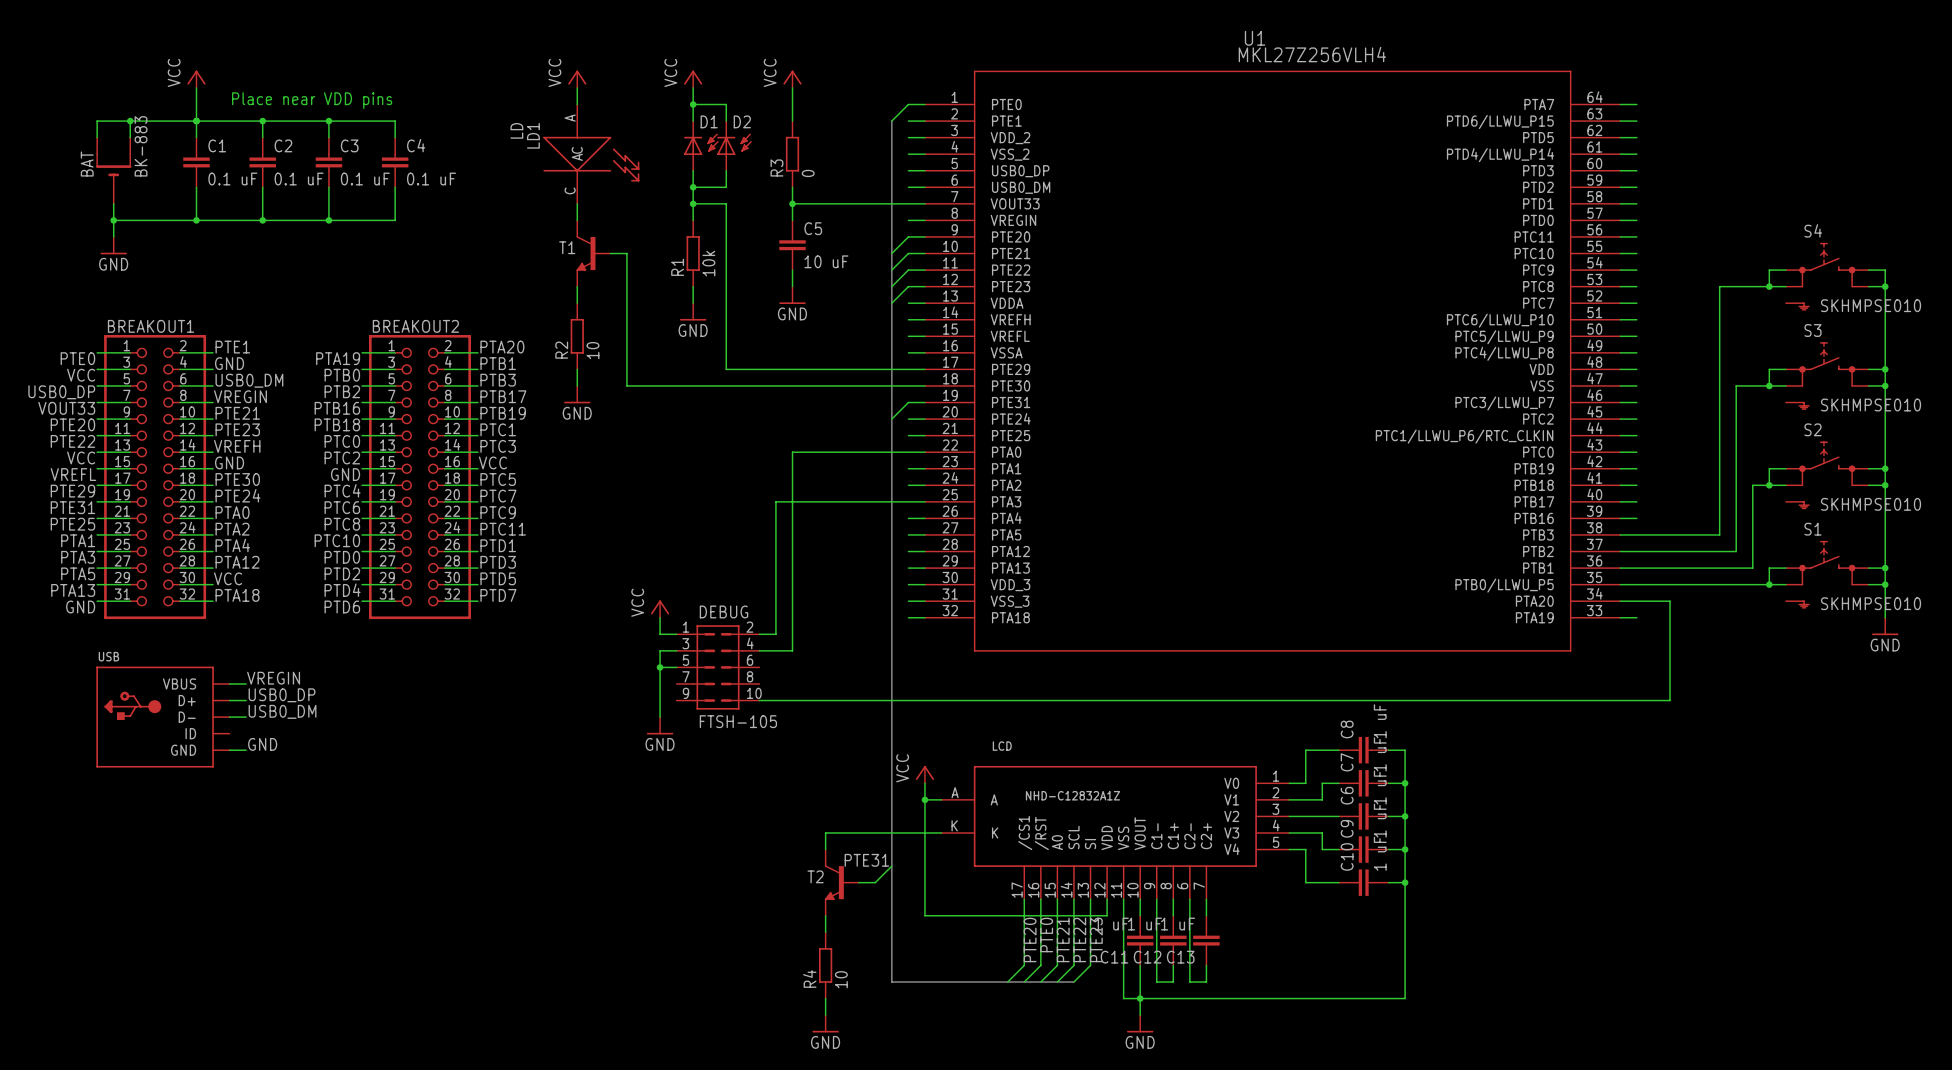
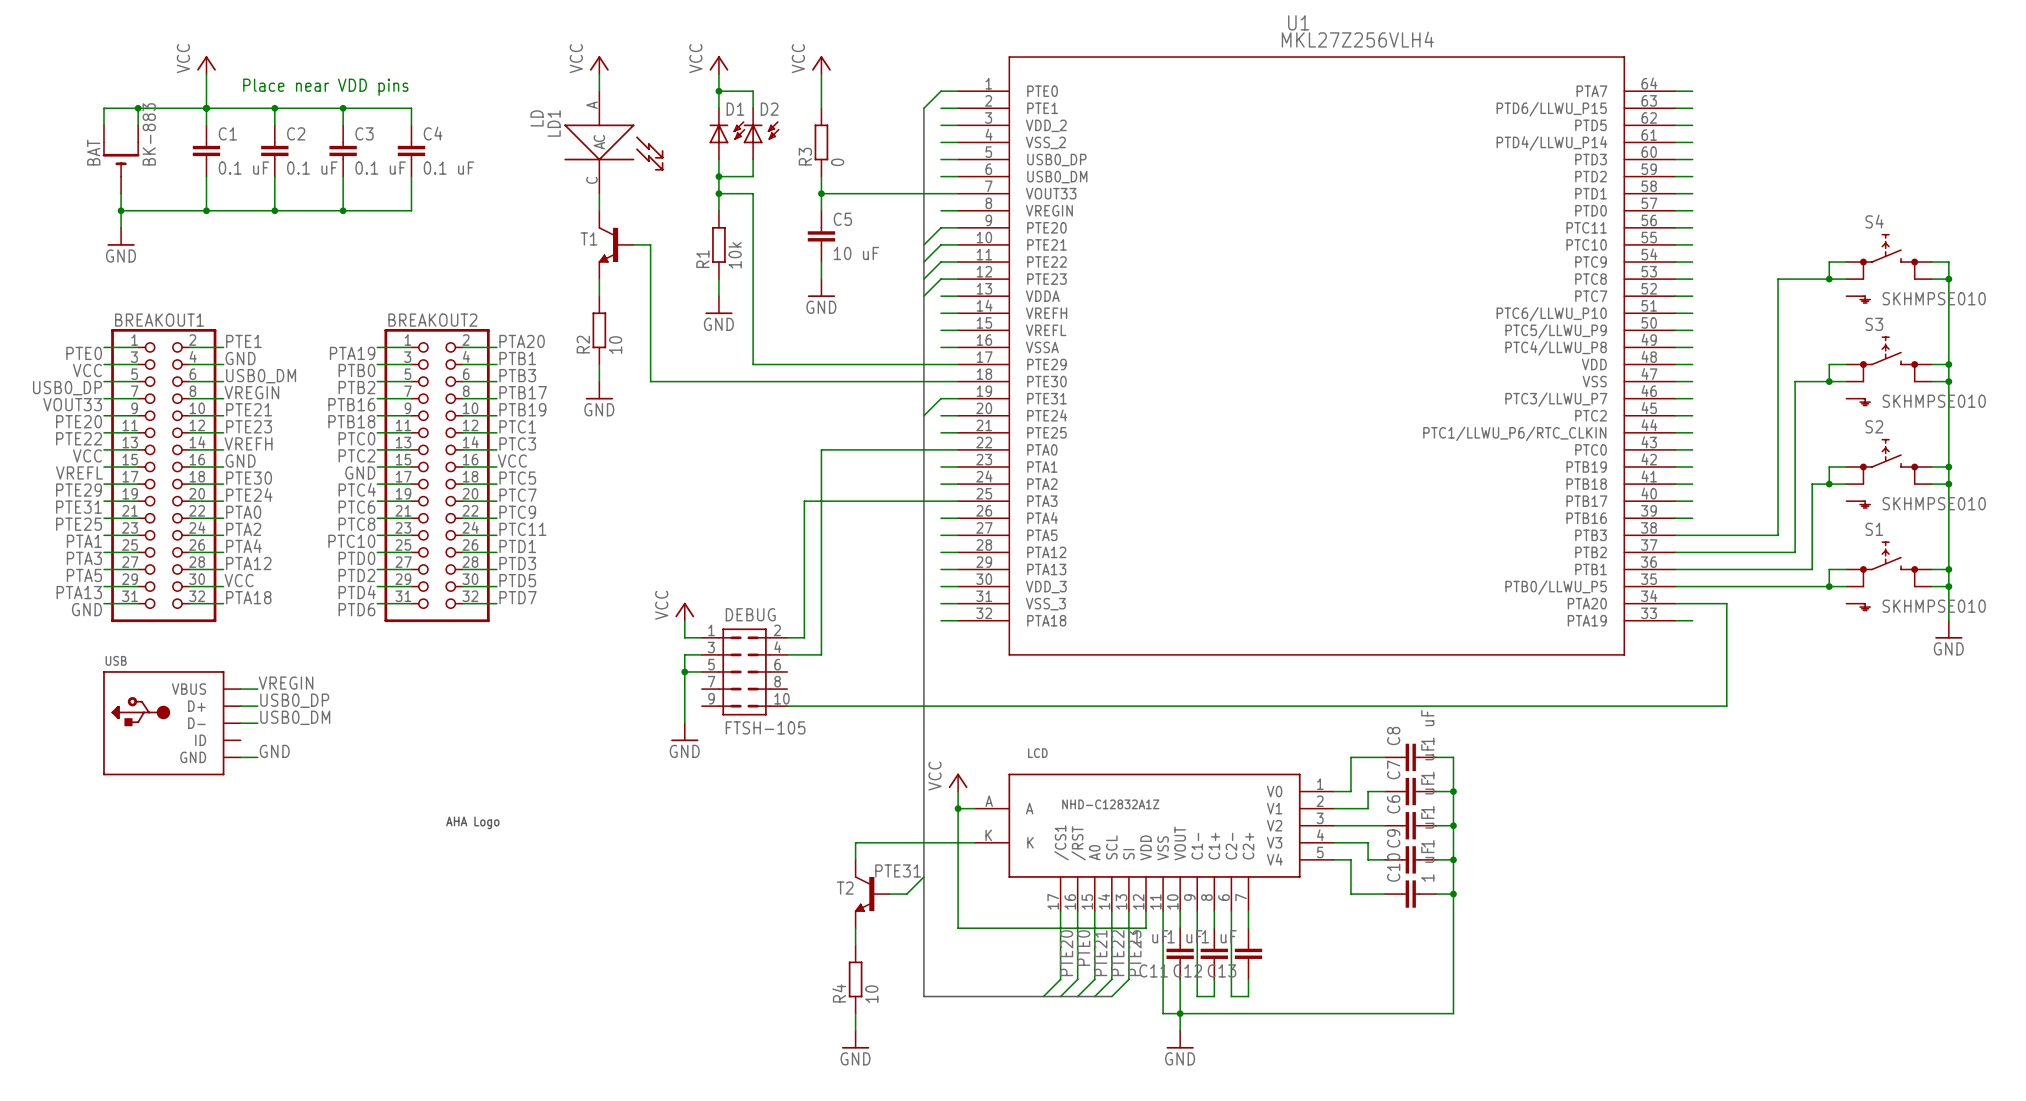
part: none -> (472, 822)

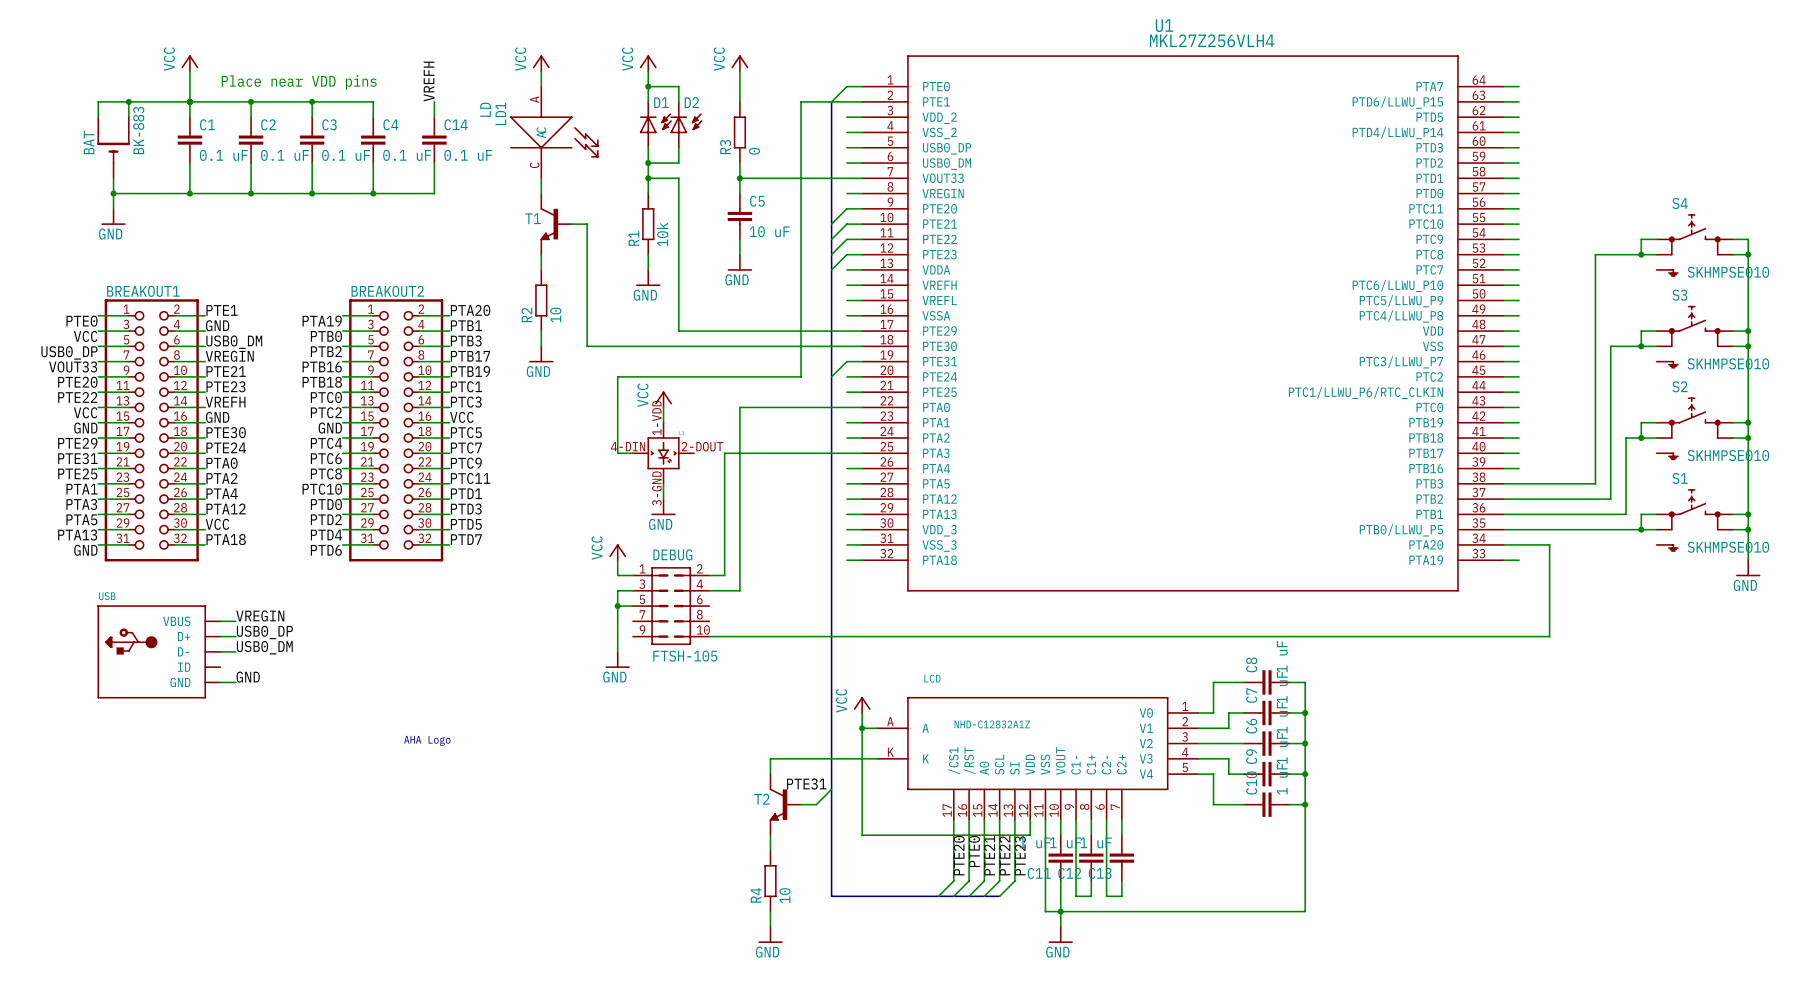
label: none -> VREFH (429, 81)
wire: none -> (434, 101) (434, 117)
wire: none -> (846, 101) (801, 101) (801, 376) (617, 376) (617, 453) (632, 453)
C14: none -> 0.1 uF (434, 140)
wire: none -> (434, 163) (434, 193) (373, 193)
junction: none -> (373, 193)
power symbol: none -> VCC (663, 399)
wire: none -> (663, 407) (663, 422)
label: VREFL (79, 472) -> GND (85, 428)
part: none -> (663, 453)
wire: none -> (663, 483) (663, 499)
power symbol: none -> GND (663, 507)

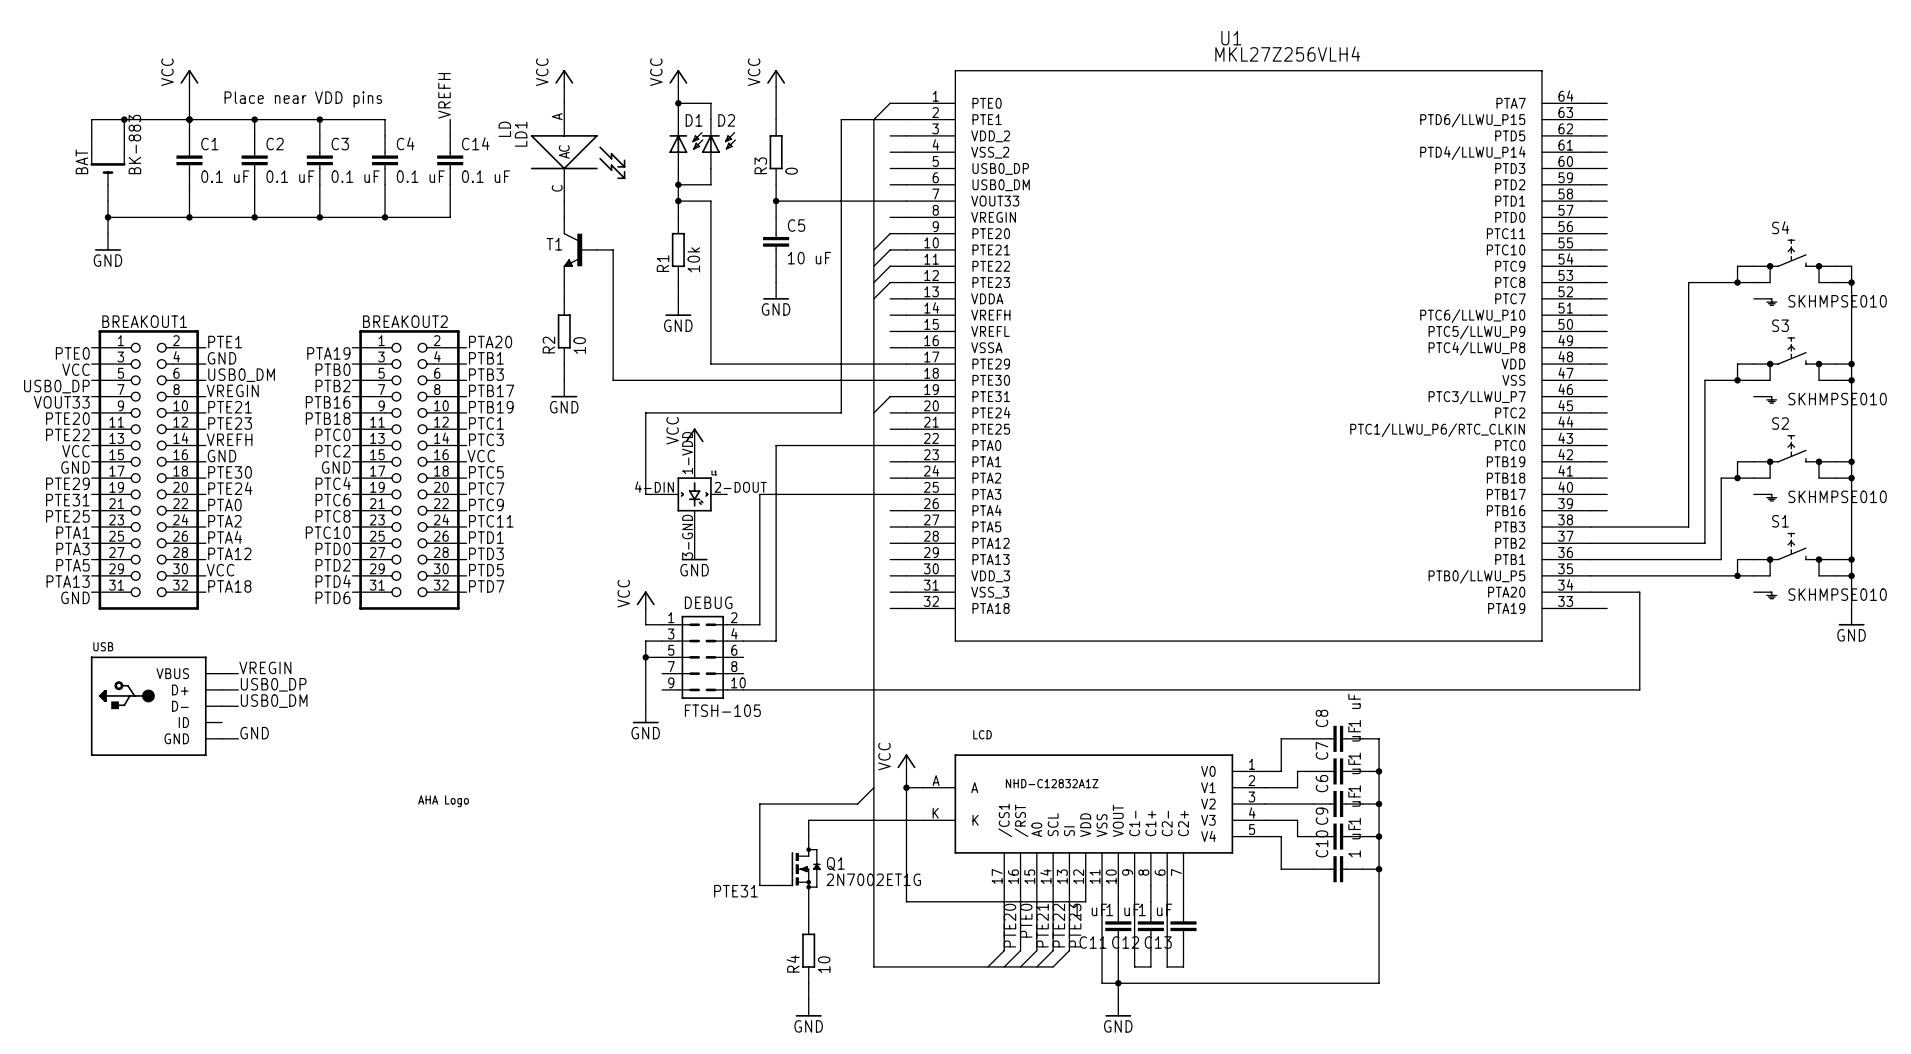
wire: none -> (873, 787) (857, 804) (759, 804) (759, 885) (776, 885)
label position: PTE31 (806, 784) -> PTE31 (735, 891)
wire: (831, 789) (816, 804) (801, 804) -> none
Q1: none -> 2N7002ET1G (798, 869)
T2: (785, 804) -> none

